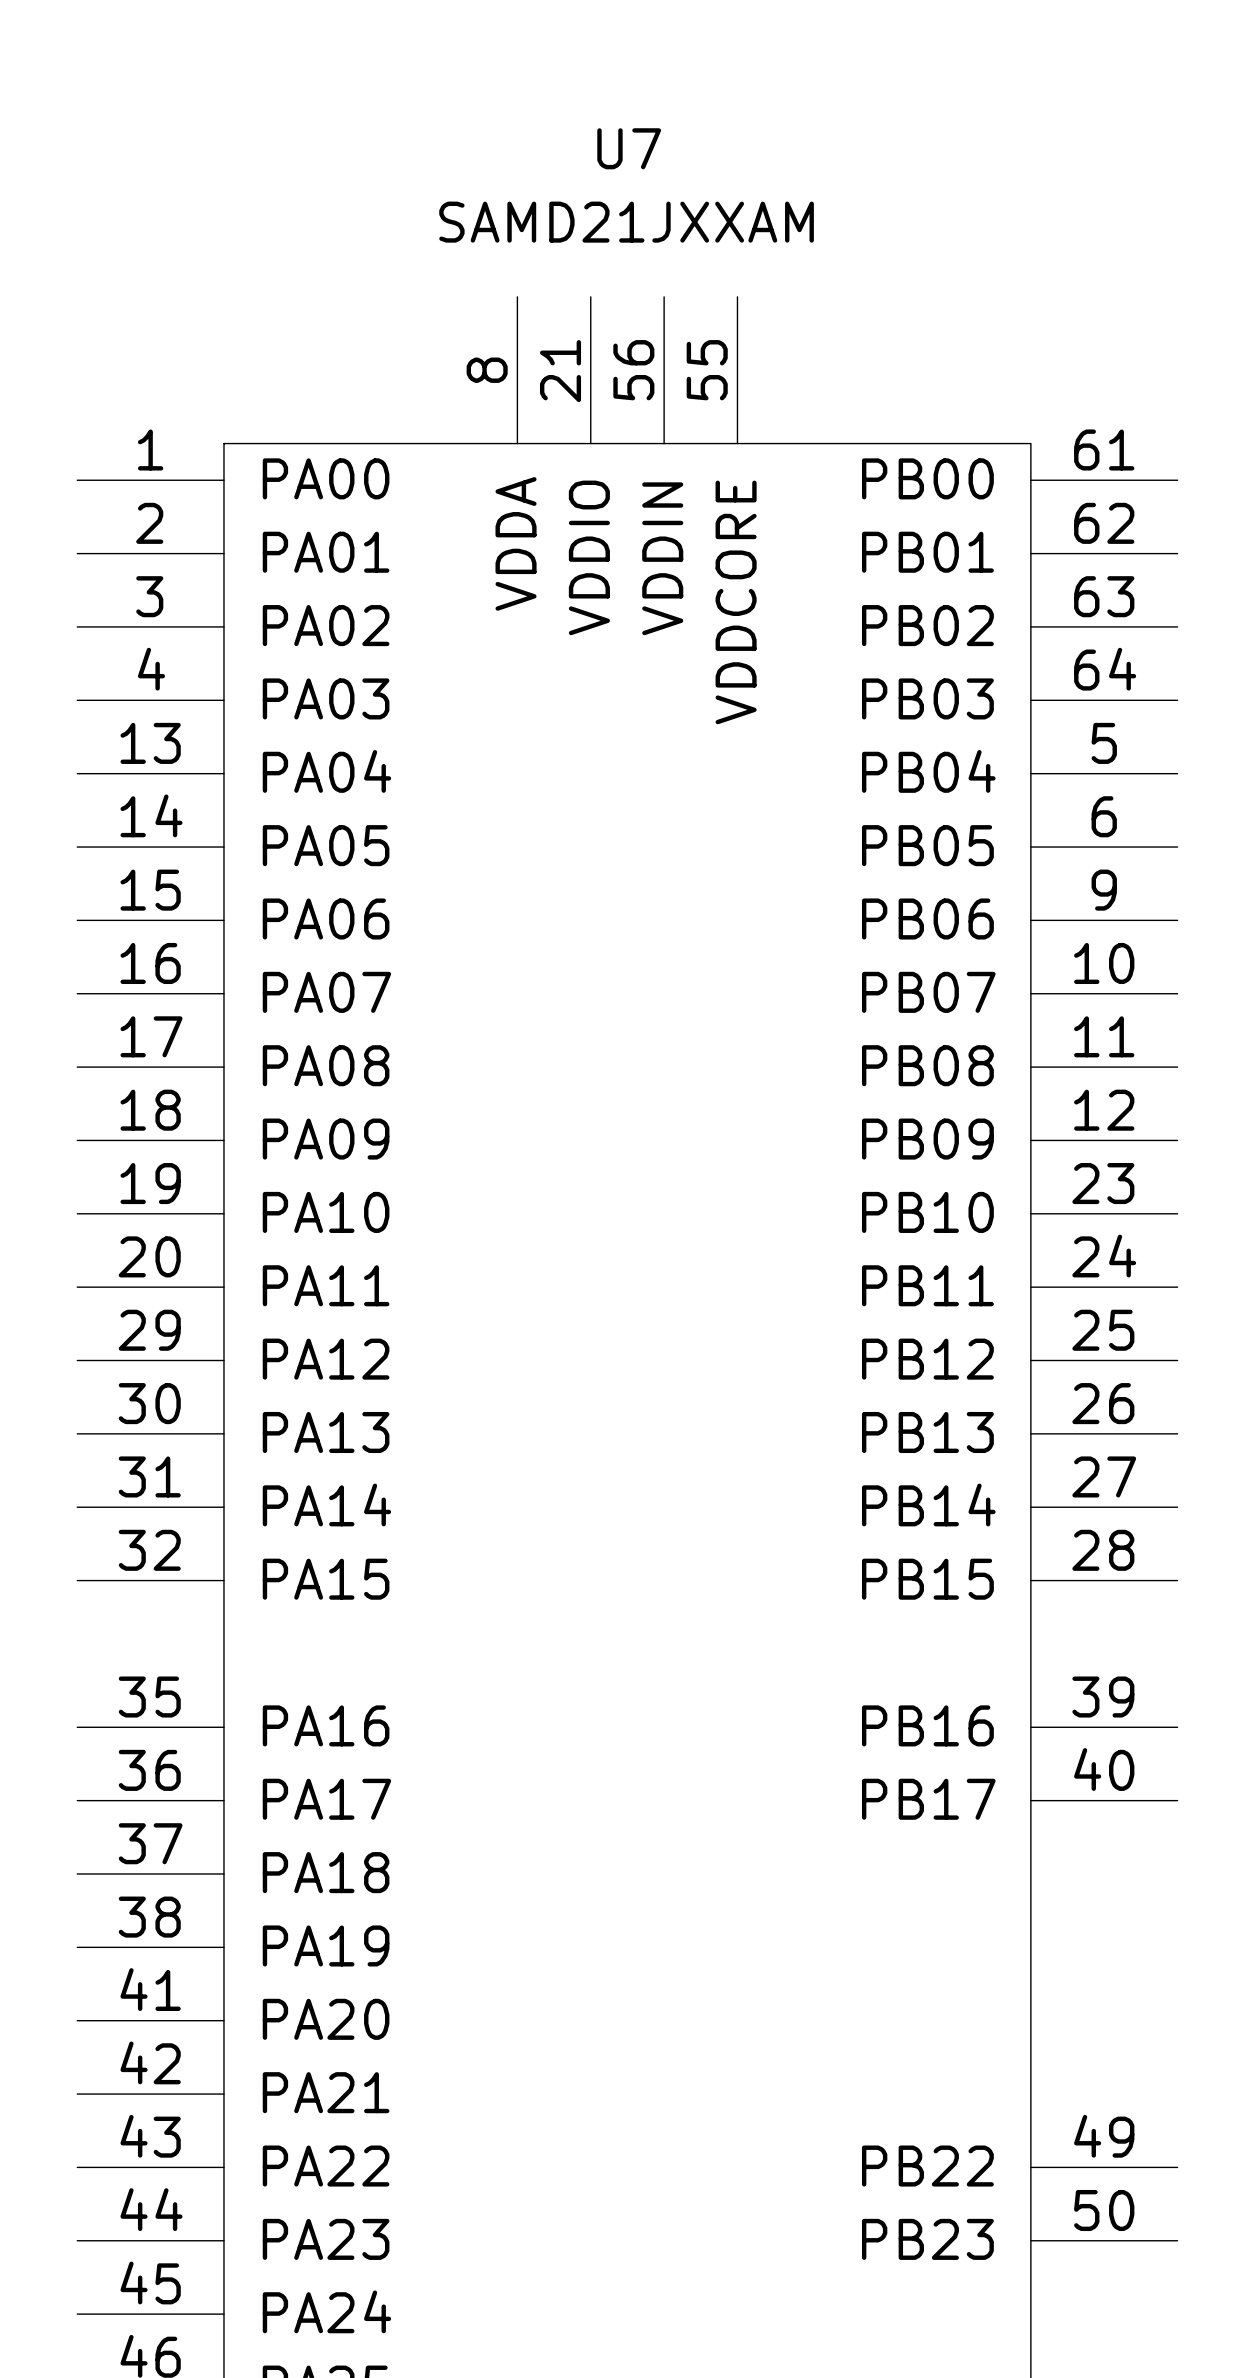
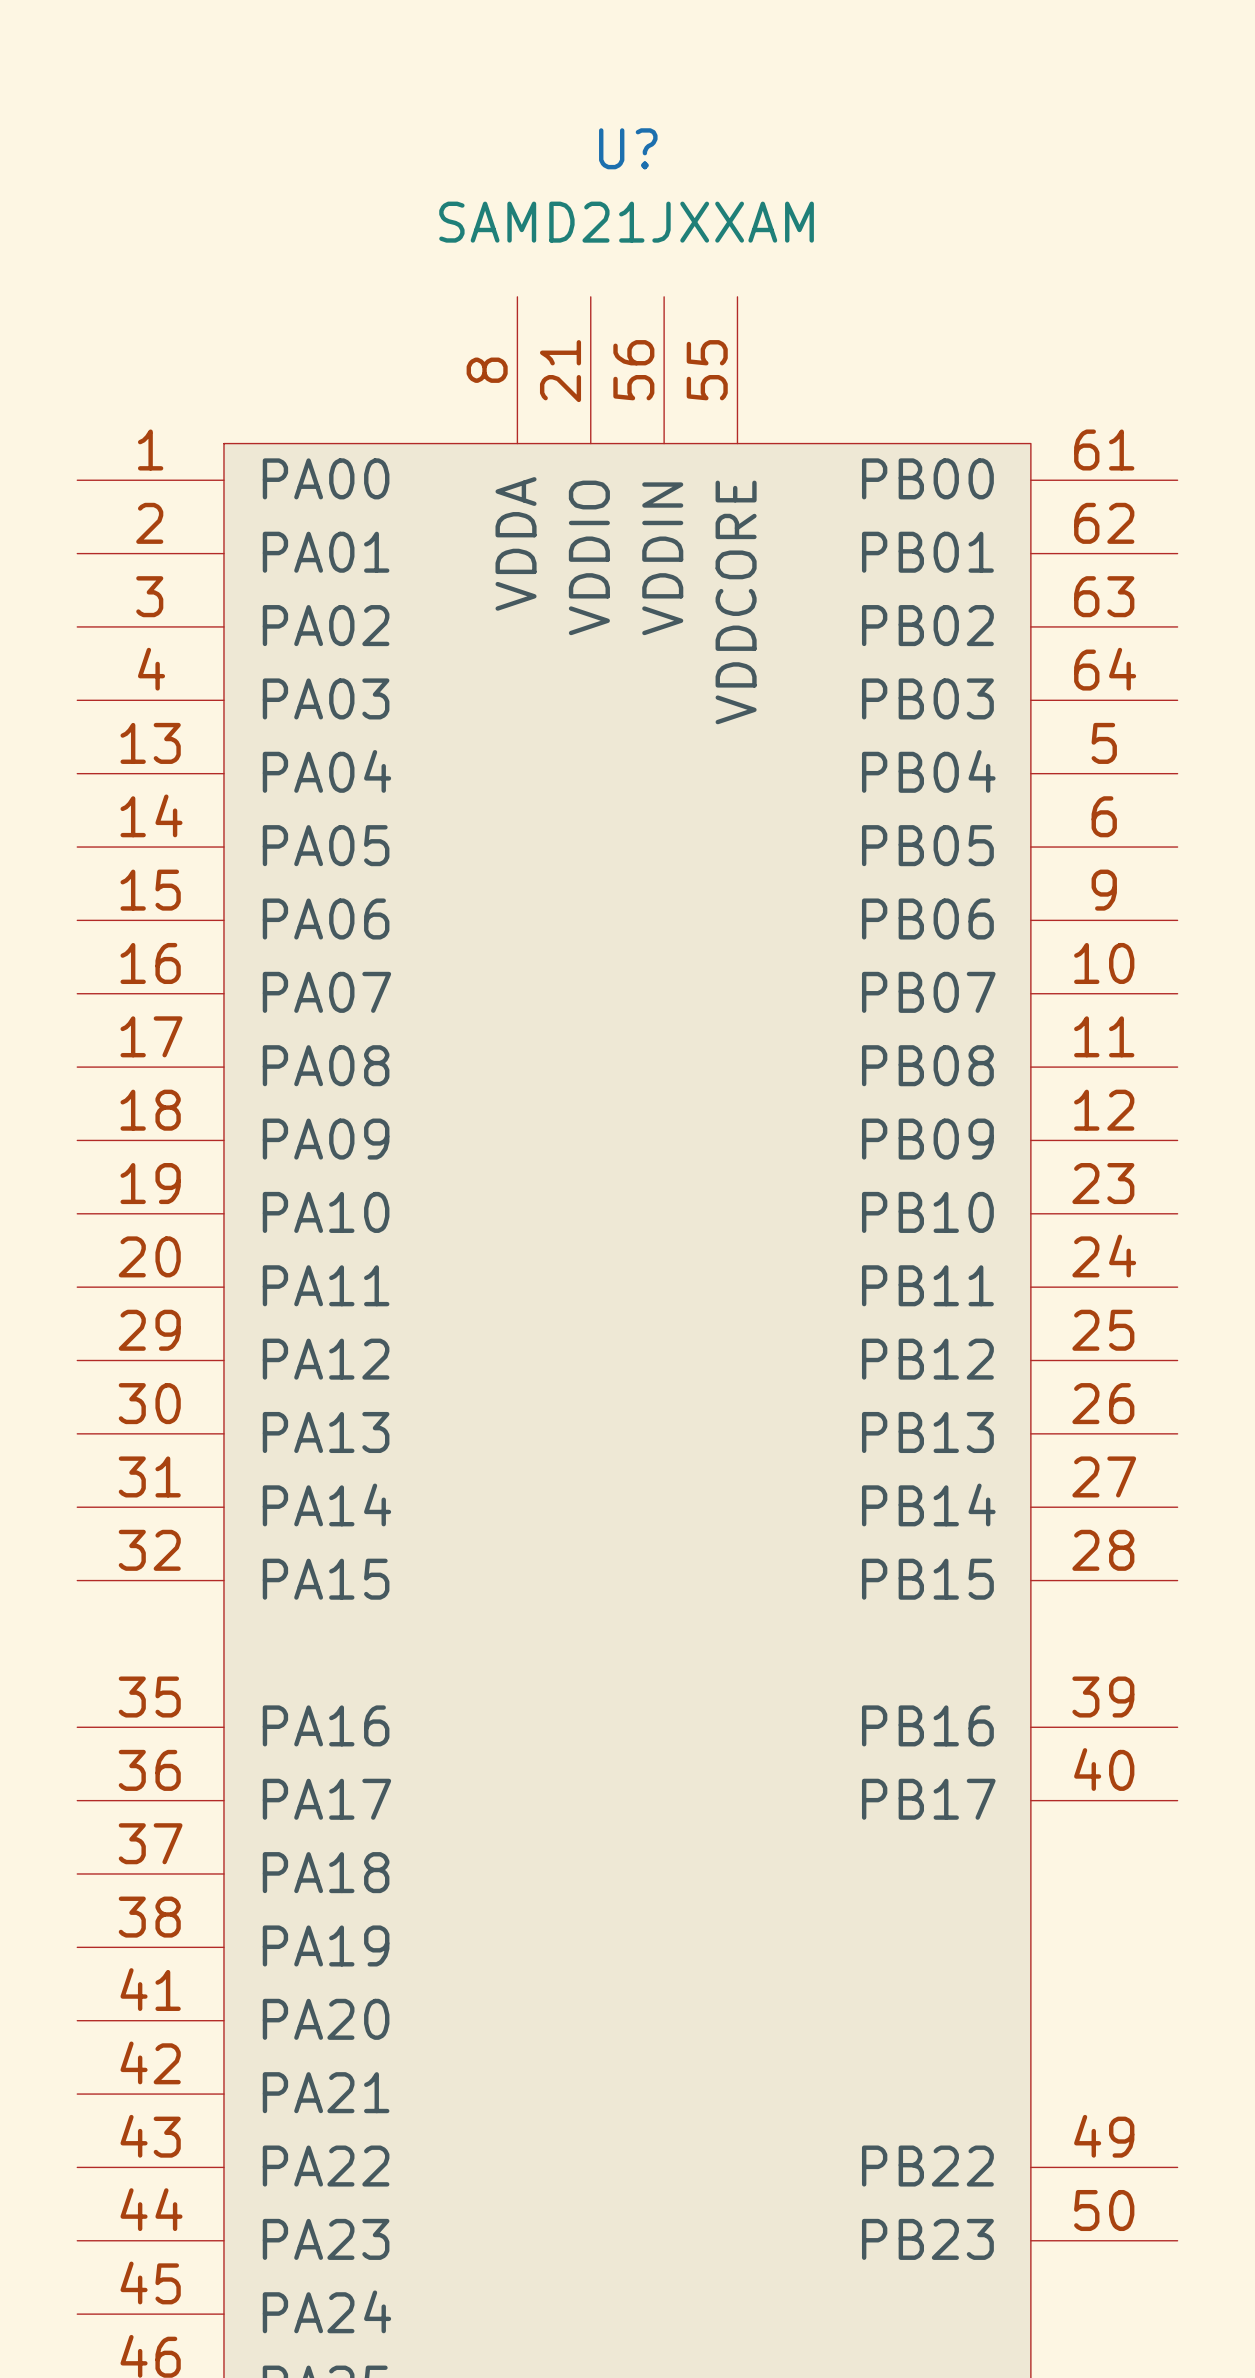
U7 name: U7 (629, 148) -> U? (628, 148)

